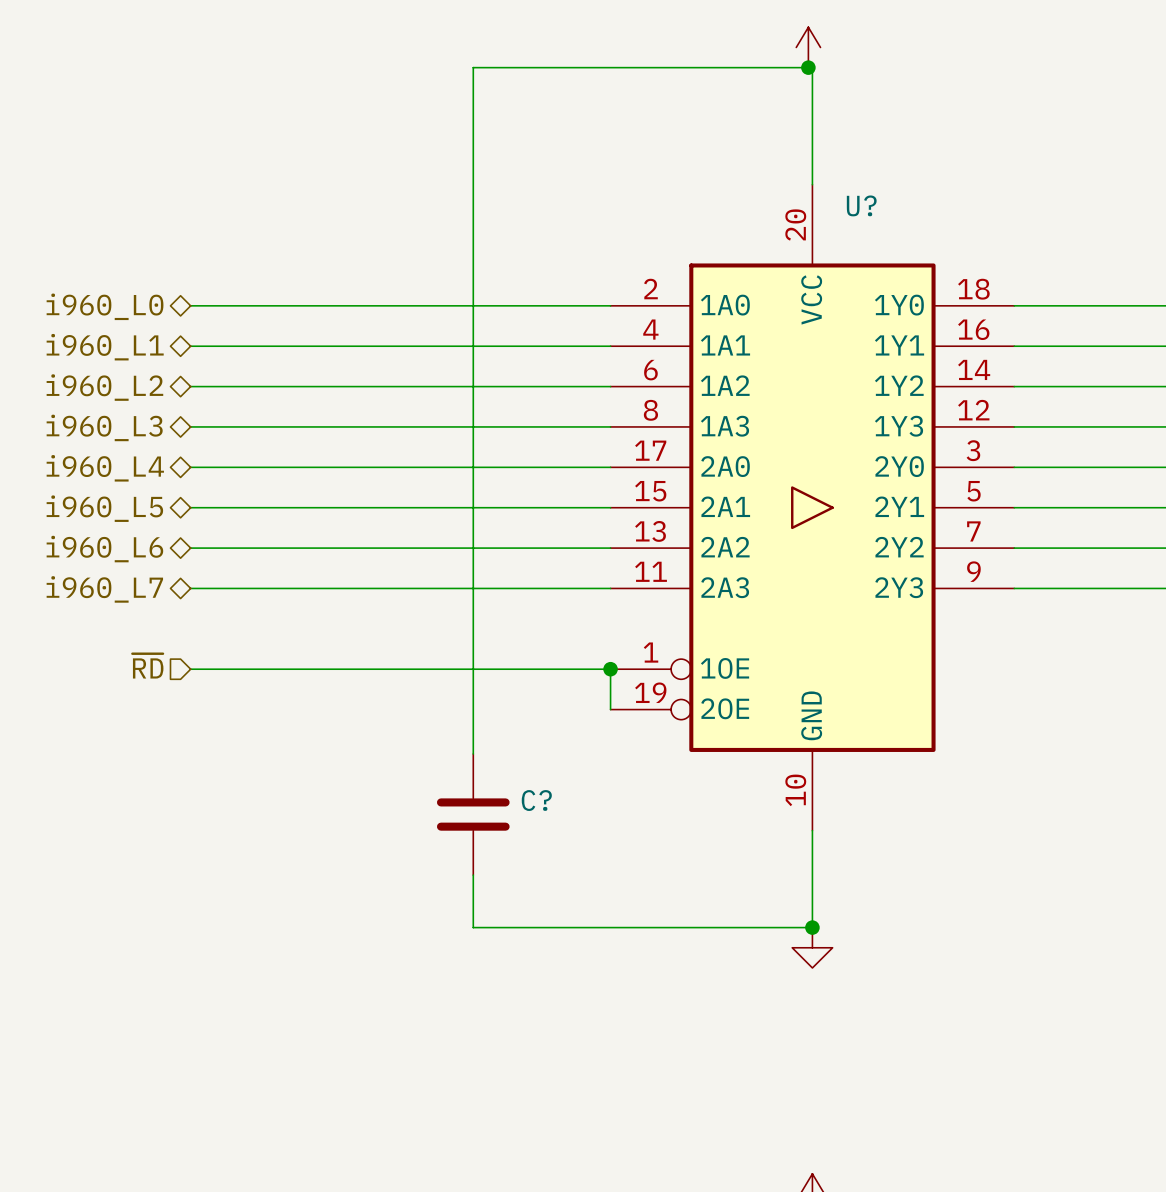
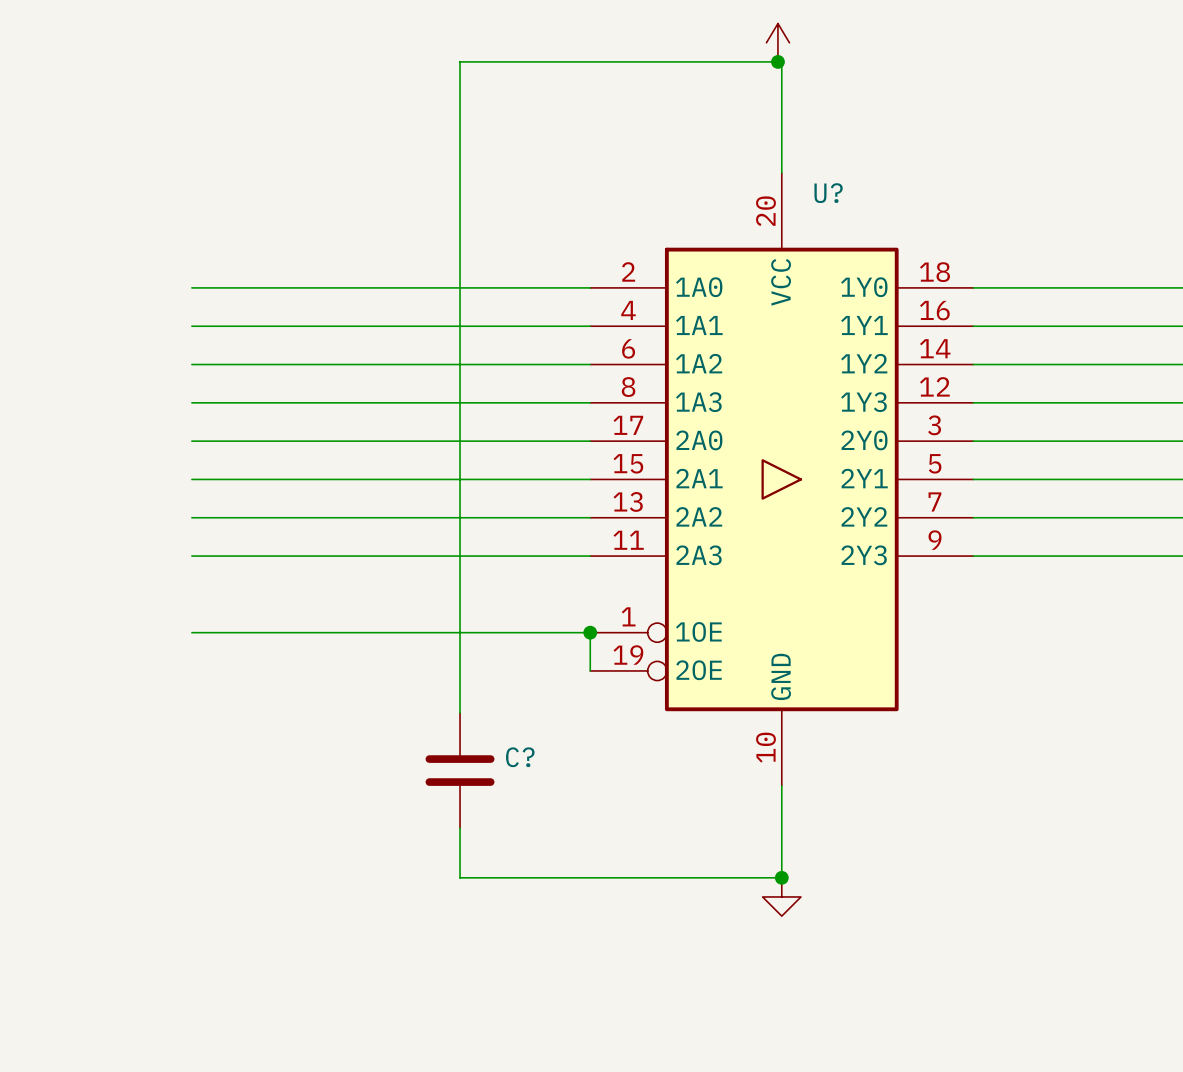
hierarchical label: i960_L0 (105, 306) -> none
hierarchical label: i960_L1 (105, 347) -> none
hierarchical label: i960_L2 (104, 387) -> none
hierarchical label: i960_L3 (104, 427) -> none
hierarchical label: i960_L4 (105, 468) -> none
hierarchical label: i960_L5 (104, 508) -> none
hierarchical label: i960_L6 (104, 549) -> none
hierarchical label: i960_L7 (104, 589) -> none
hierarchical label: ~{RD} (147, 666) -> none

